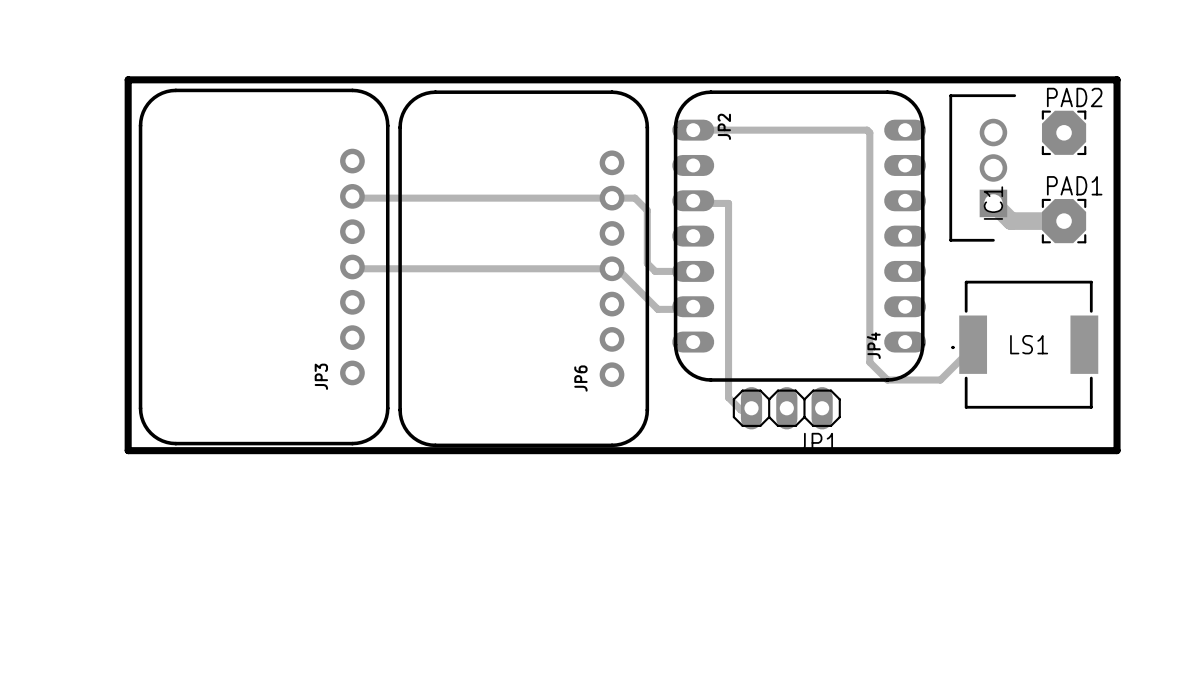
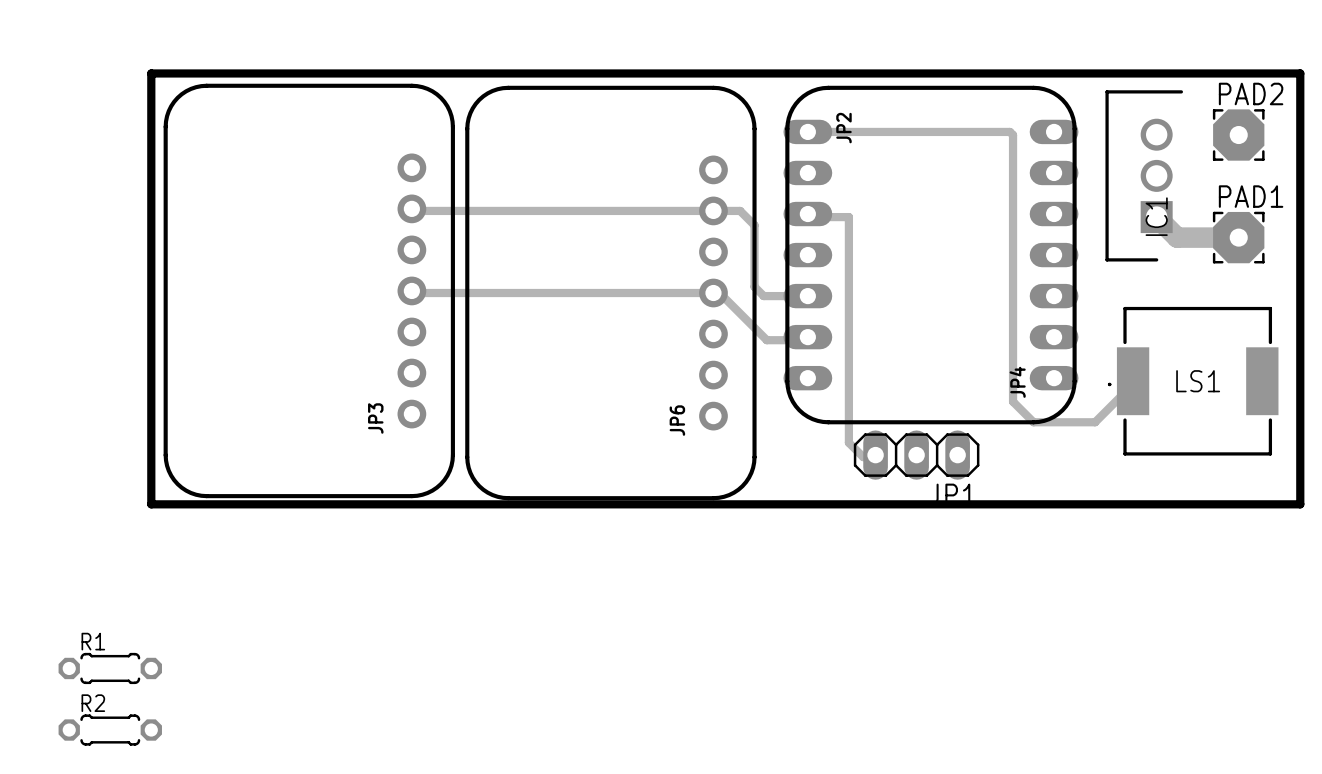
R1: none -> (110, 668)
R2: none -> (110, 730)

